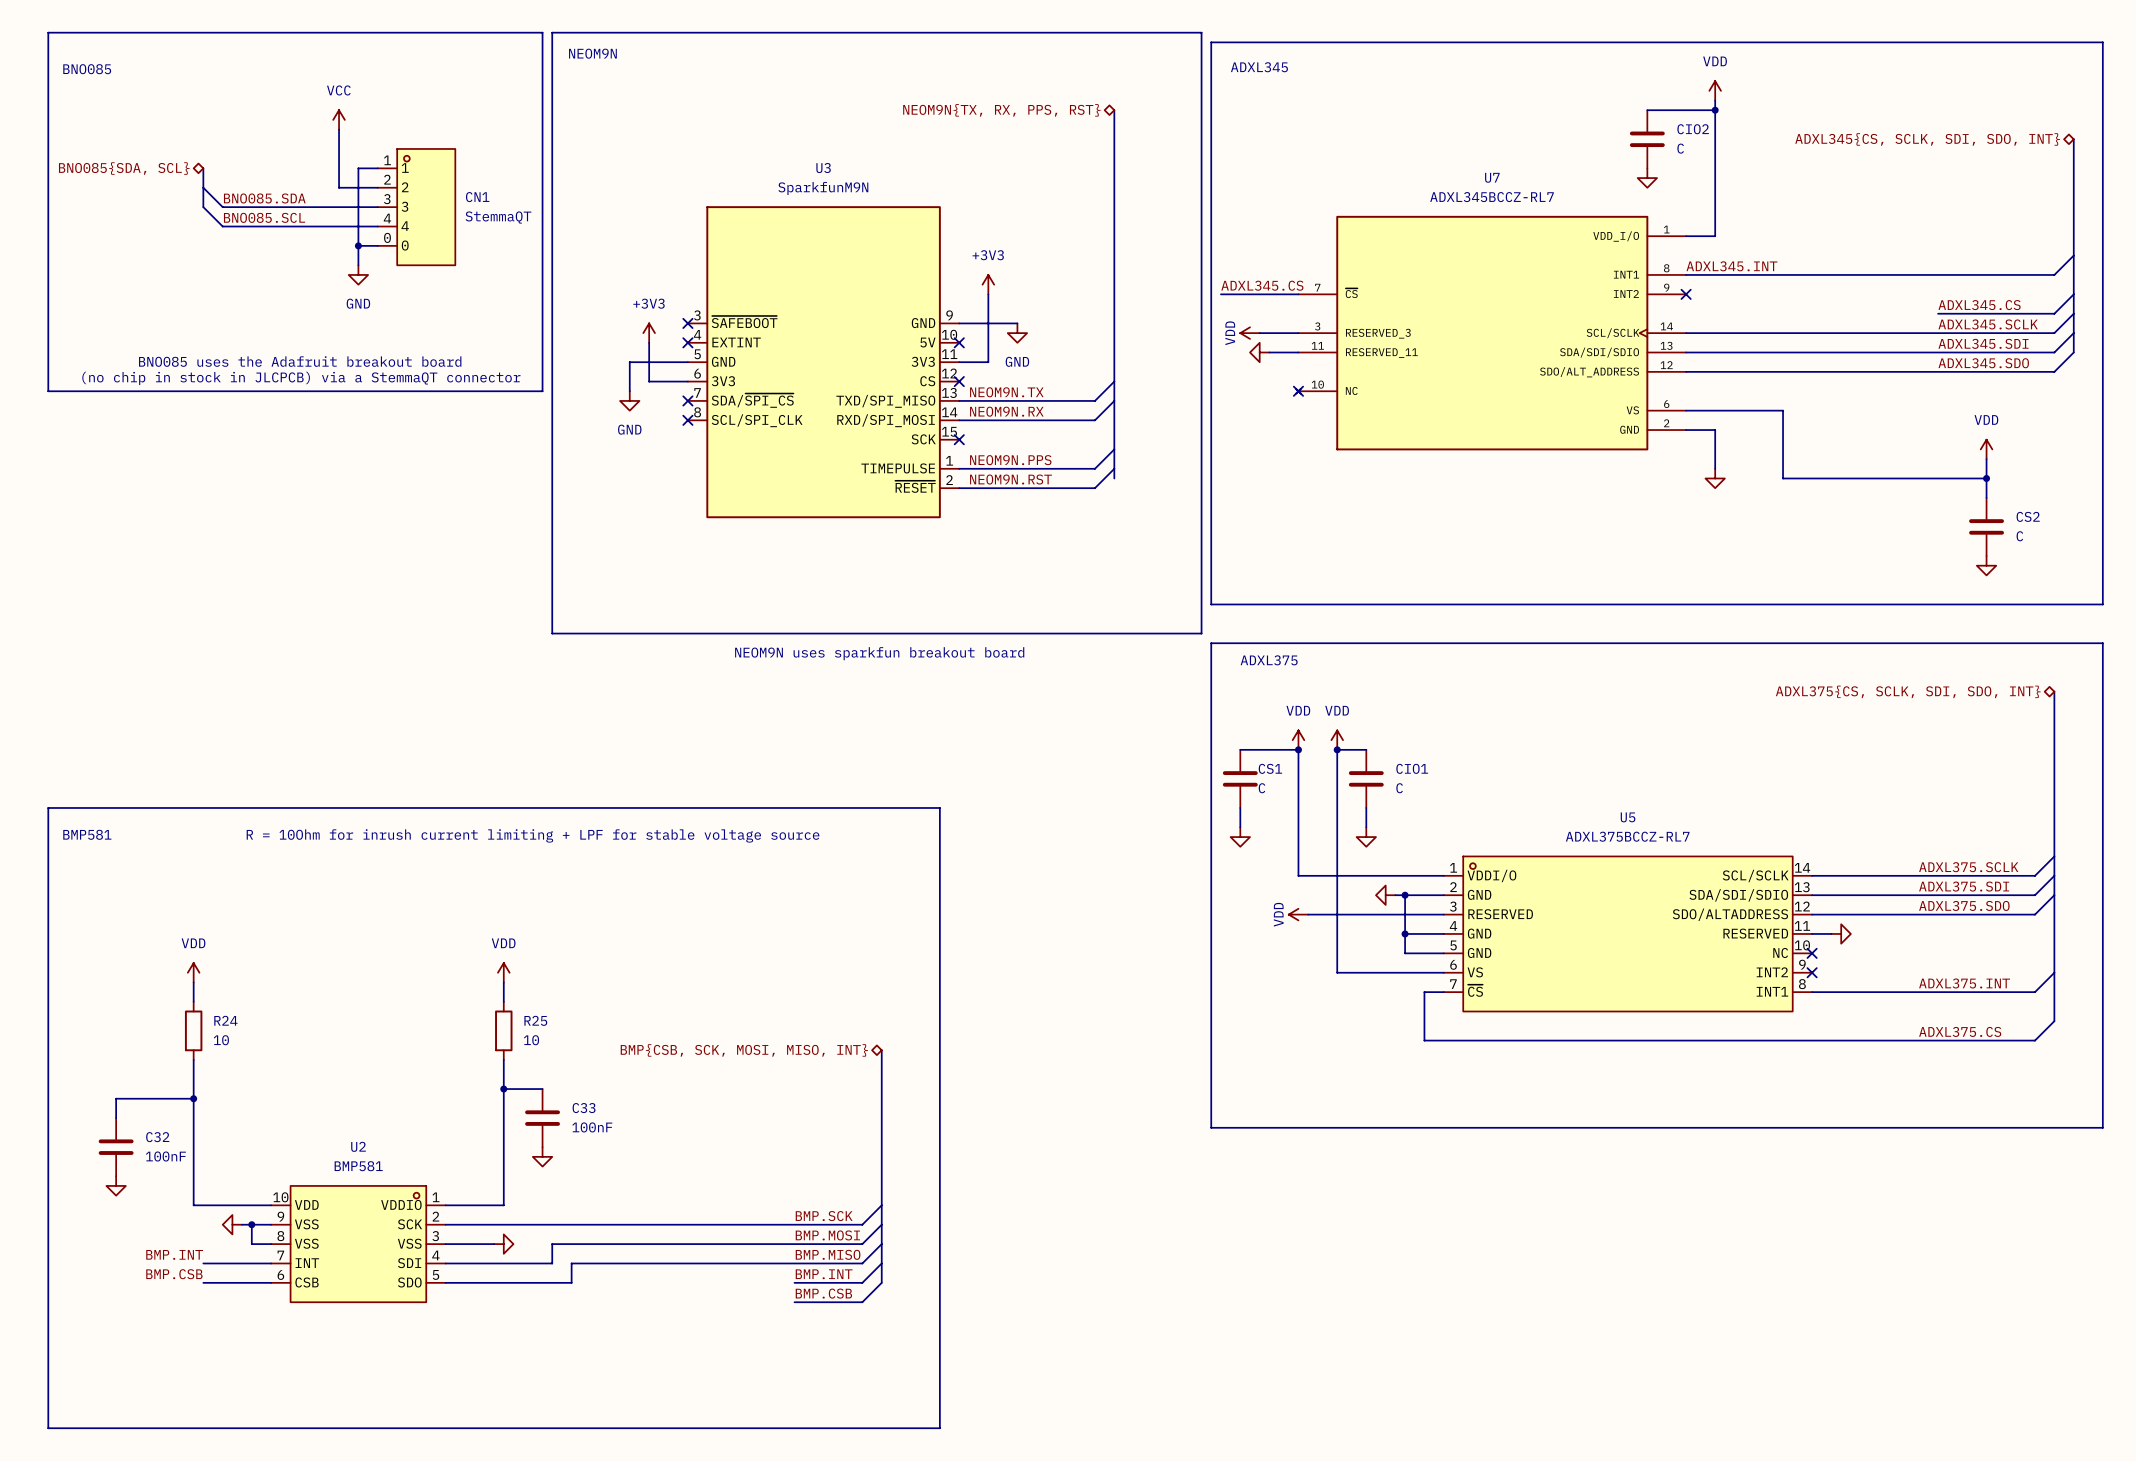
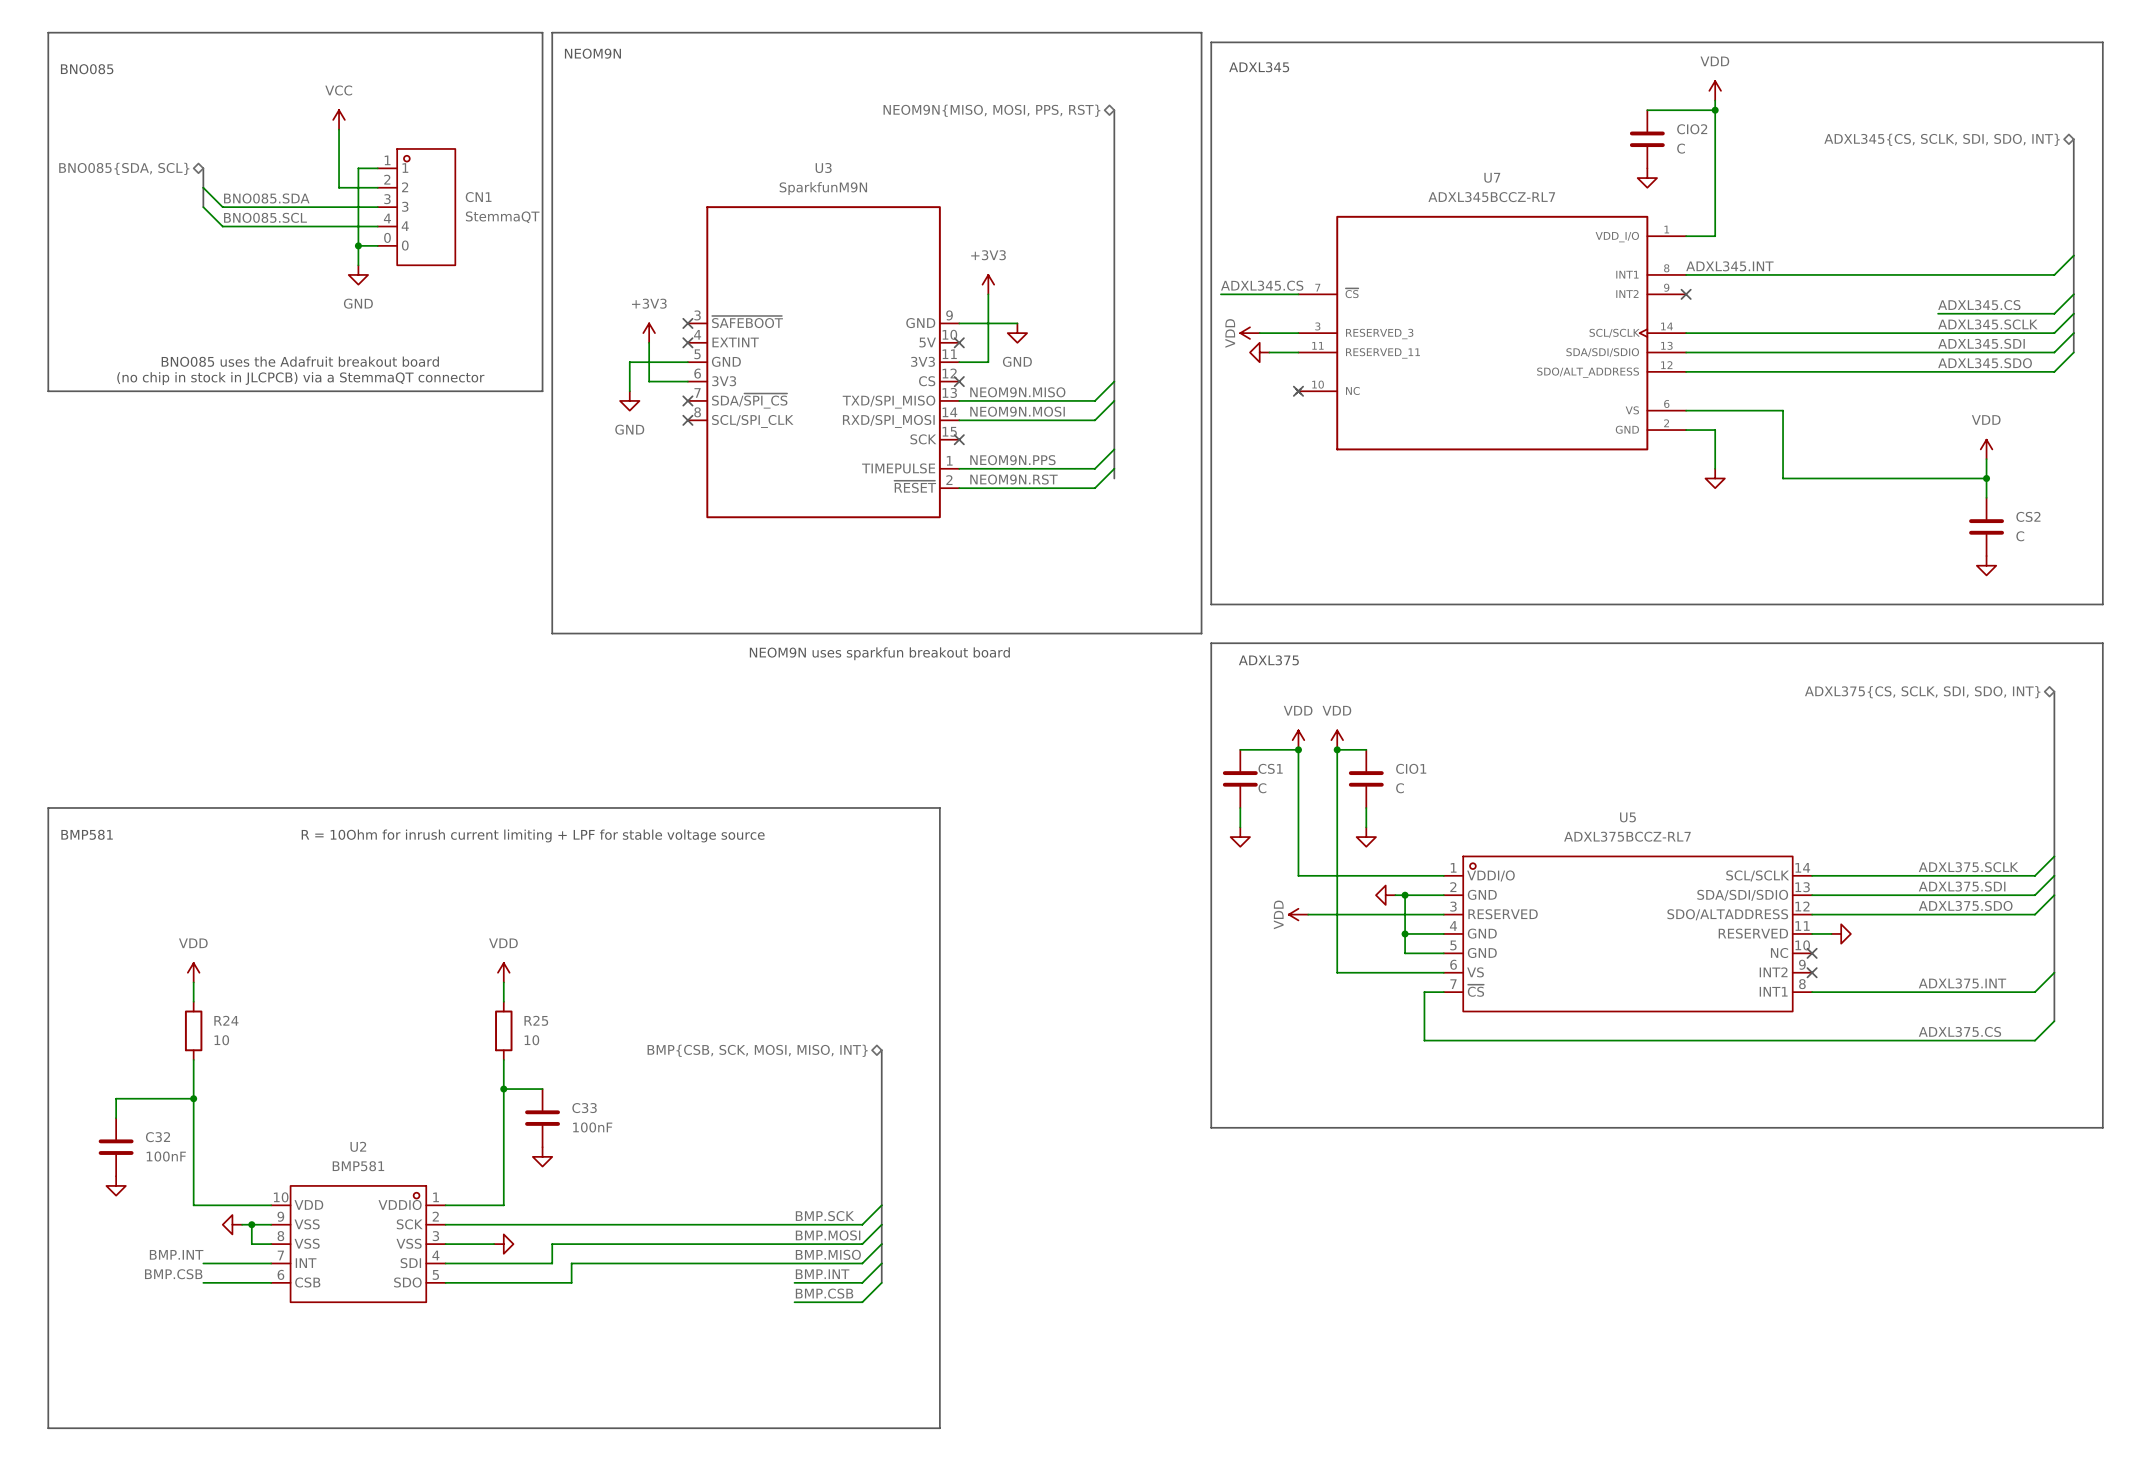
hierarchical label: NEOM9N{TX, RX, PPS, RST} (1001, 110) -> NEOM9N{MISO, MOSI, PPS, RST} (991, 110)
label: NEOM9N.TX (1006, 392) -> NEOM9N.MISO (1017, 392)
label: NEOM9N.RX (1006, 411) -> NEOM9N.MOSI (1017, 411)

